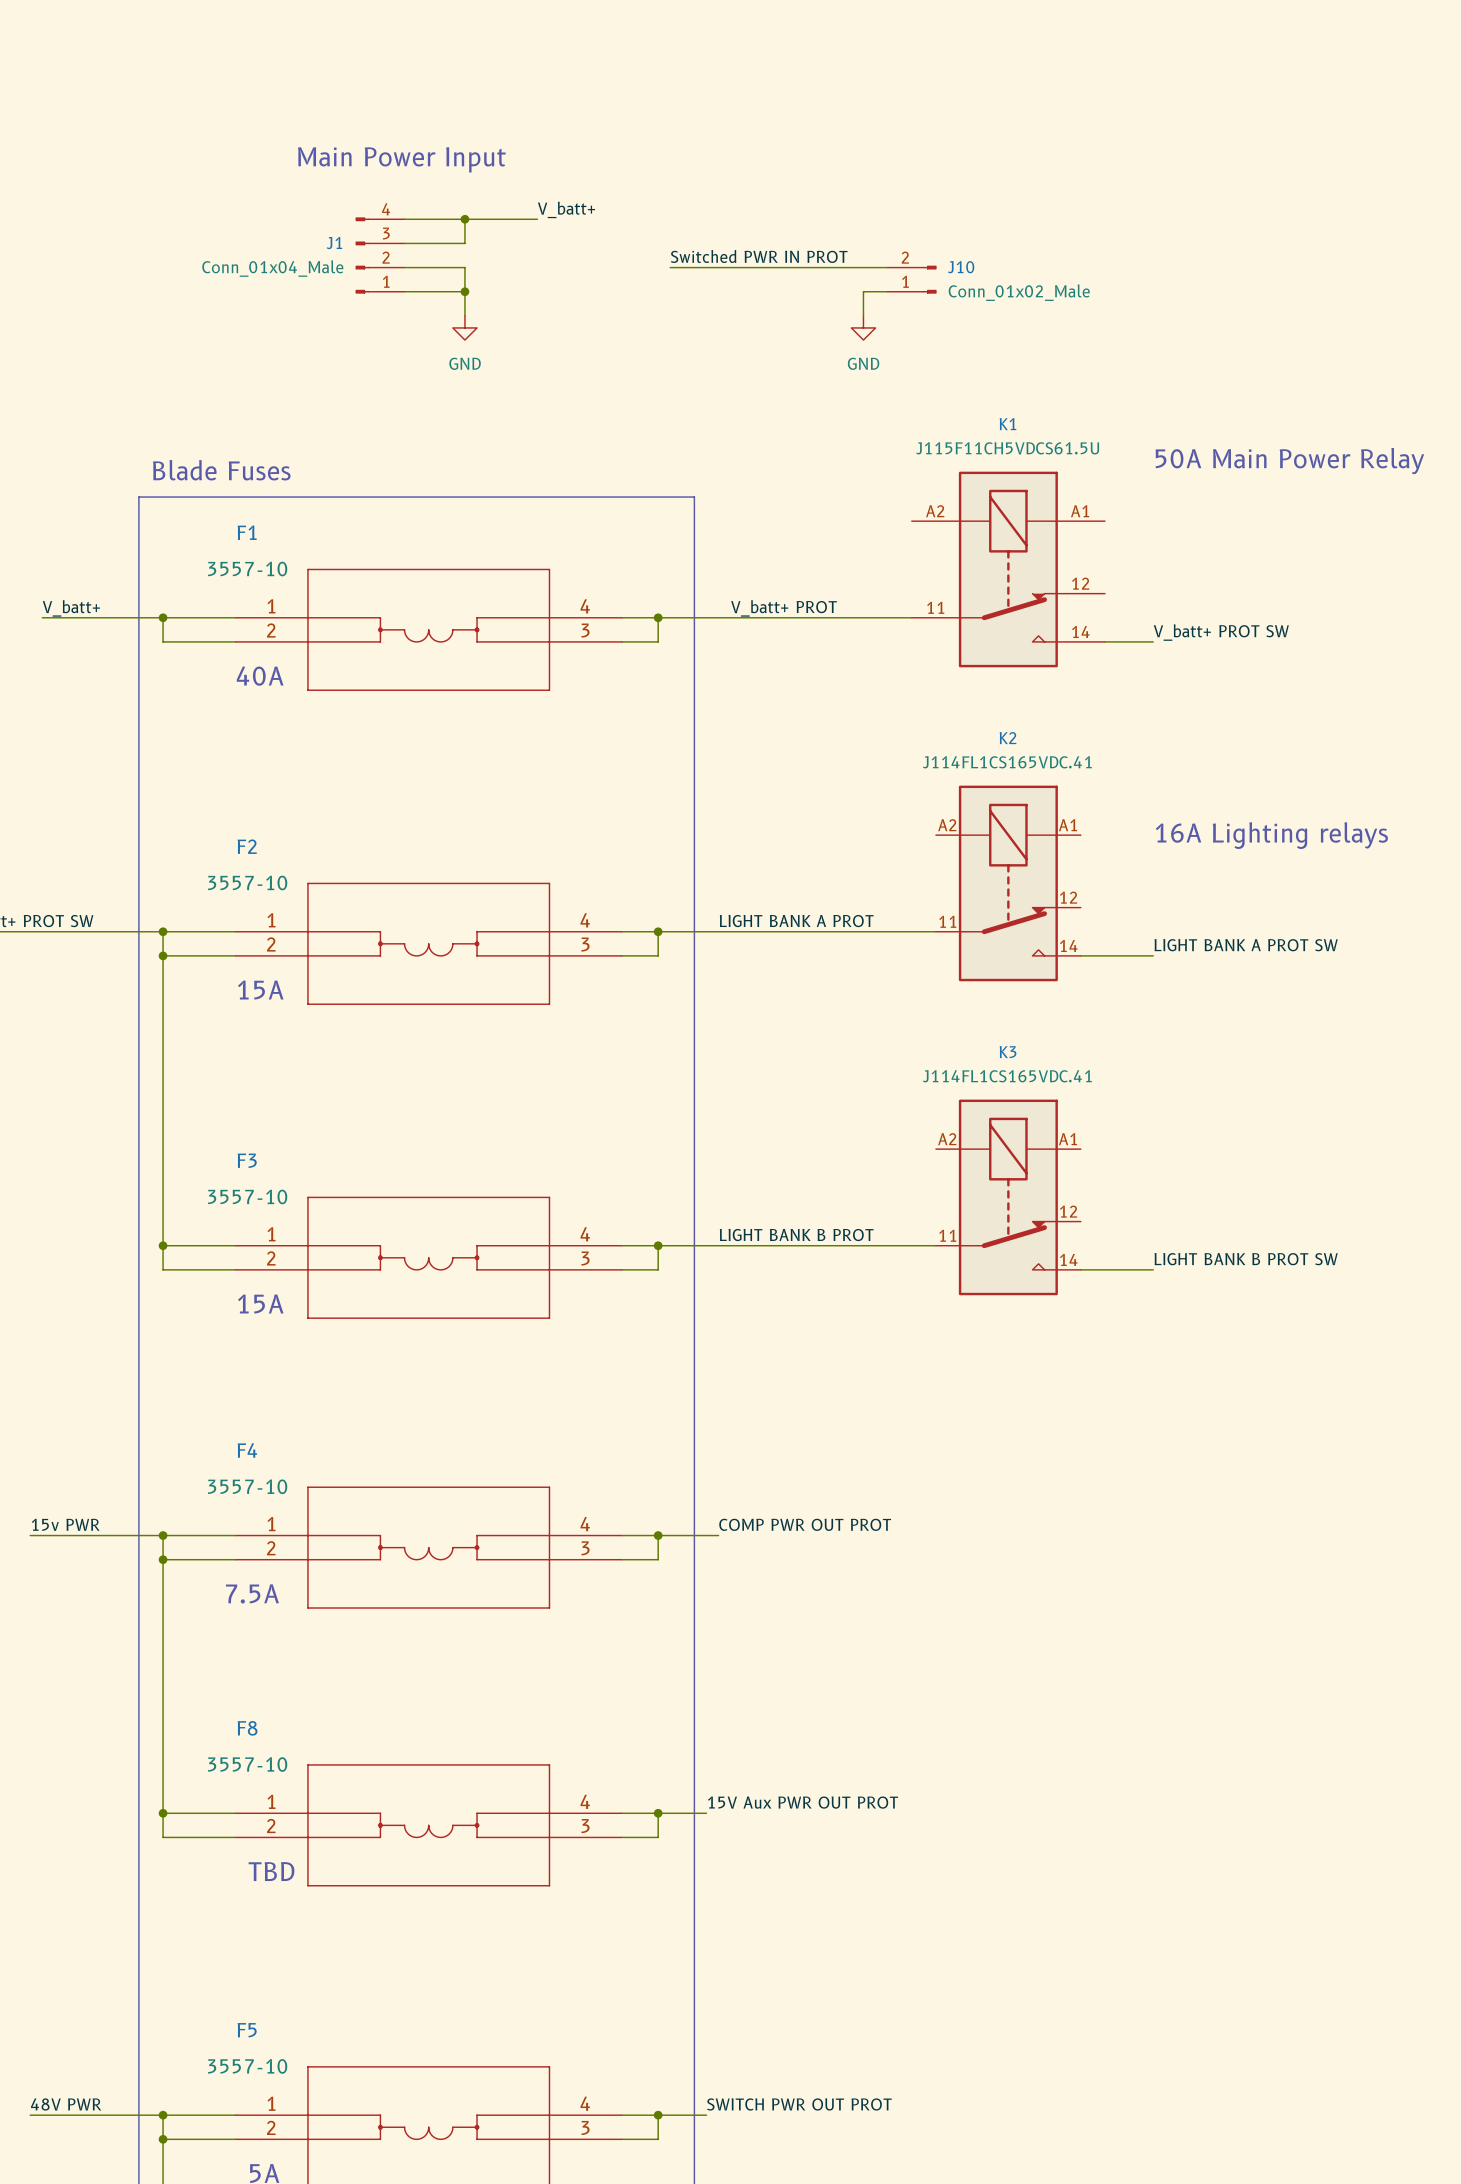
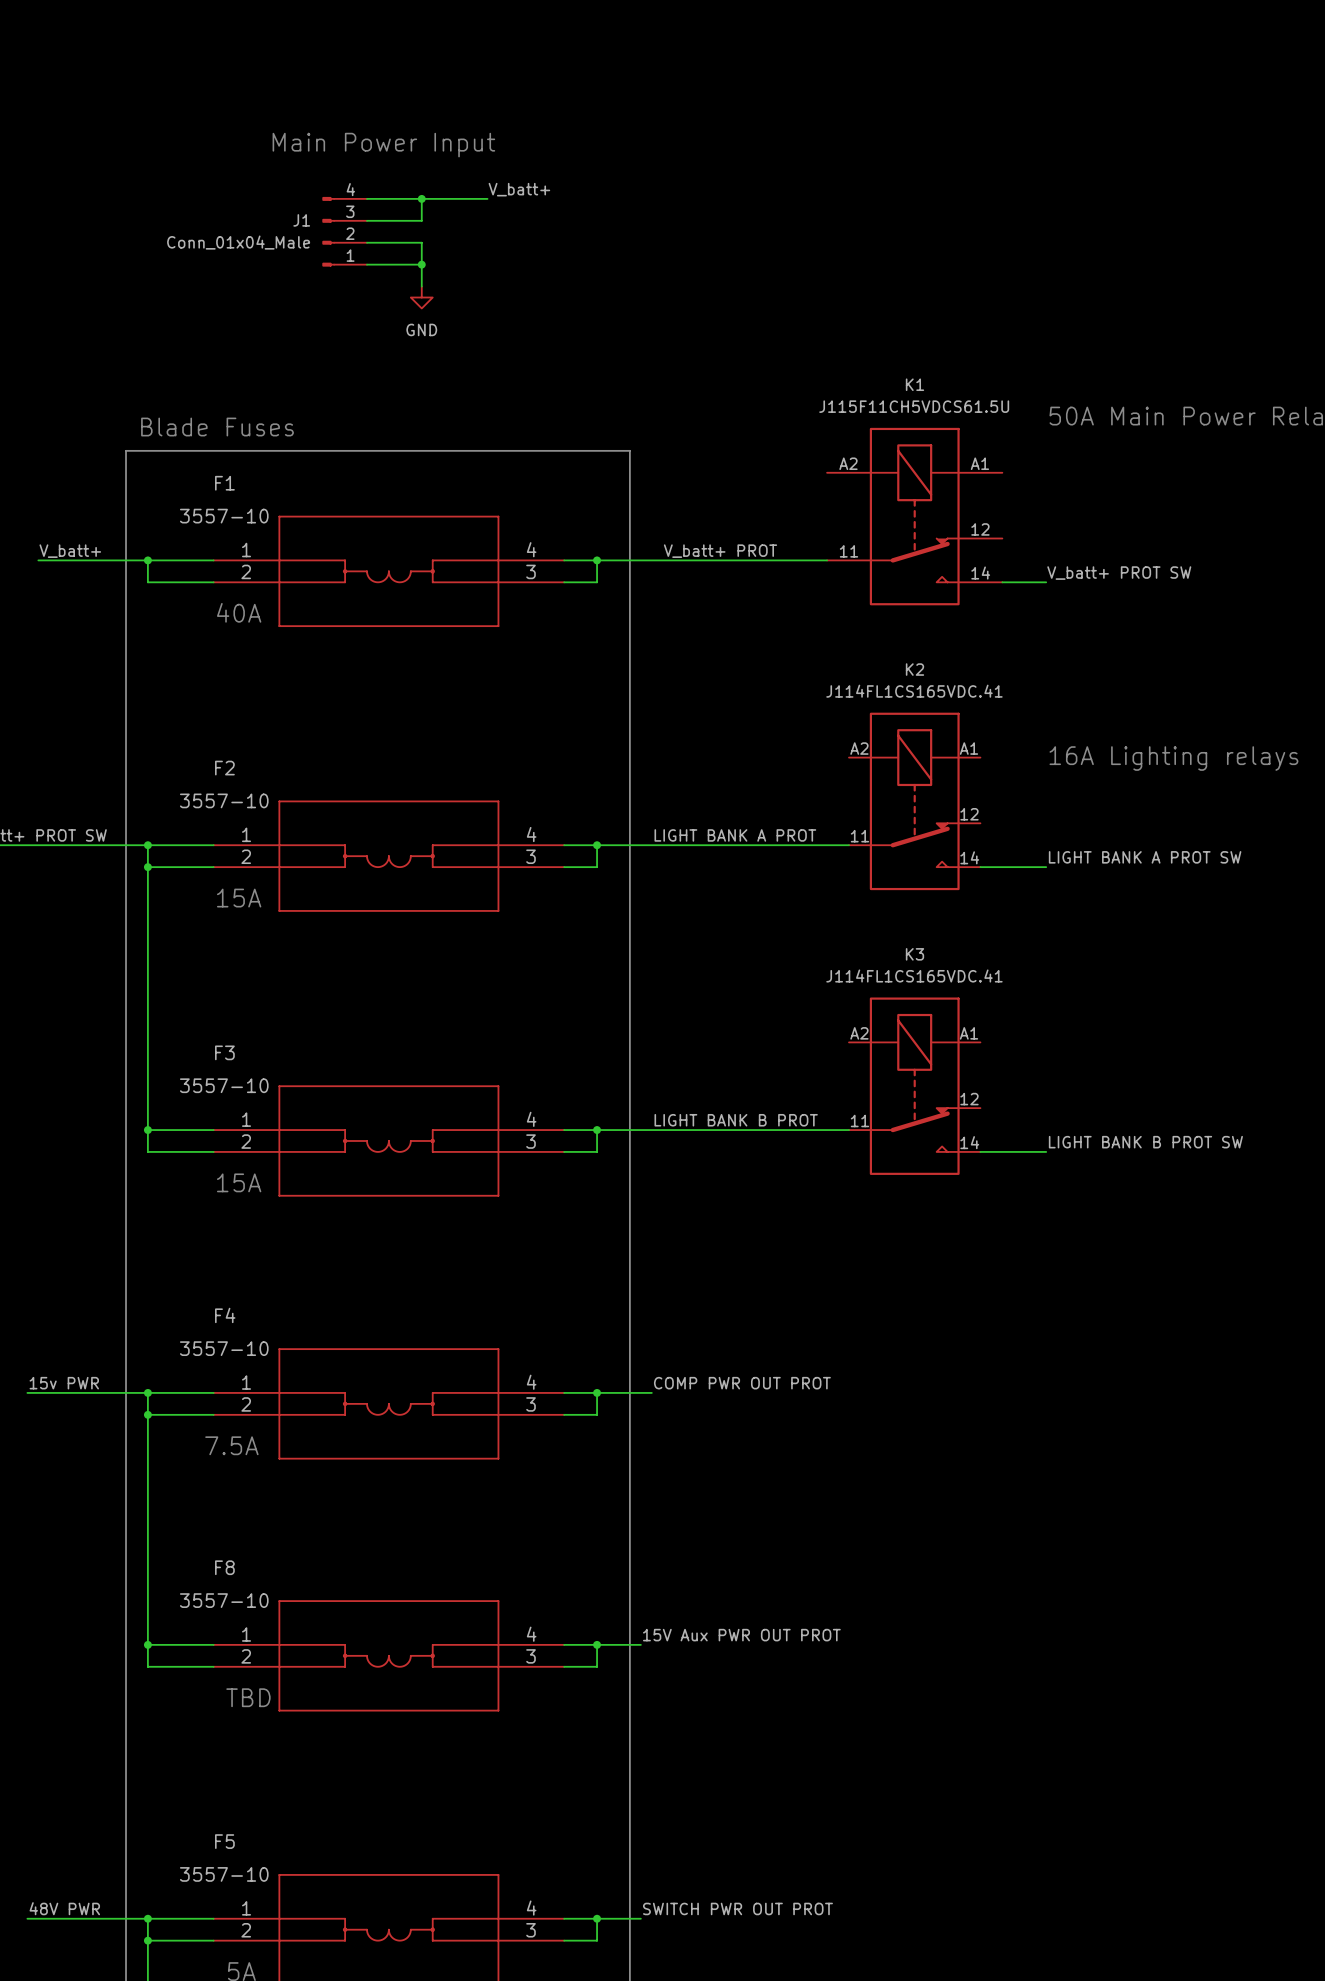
label: Switched PWR IN PROT (759, 256) -> none
wire: (670, 267) (887, 267) -> none
J10: Conn_01x02_Male (912, 279) -> none
wire: (887, 291) (863, 291) (863, 315) -> none
power symbol: GND (863, 327) -> none

